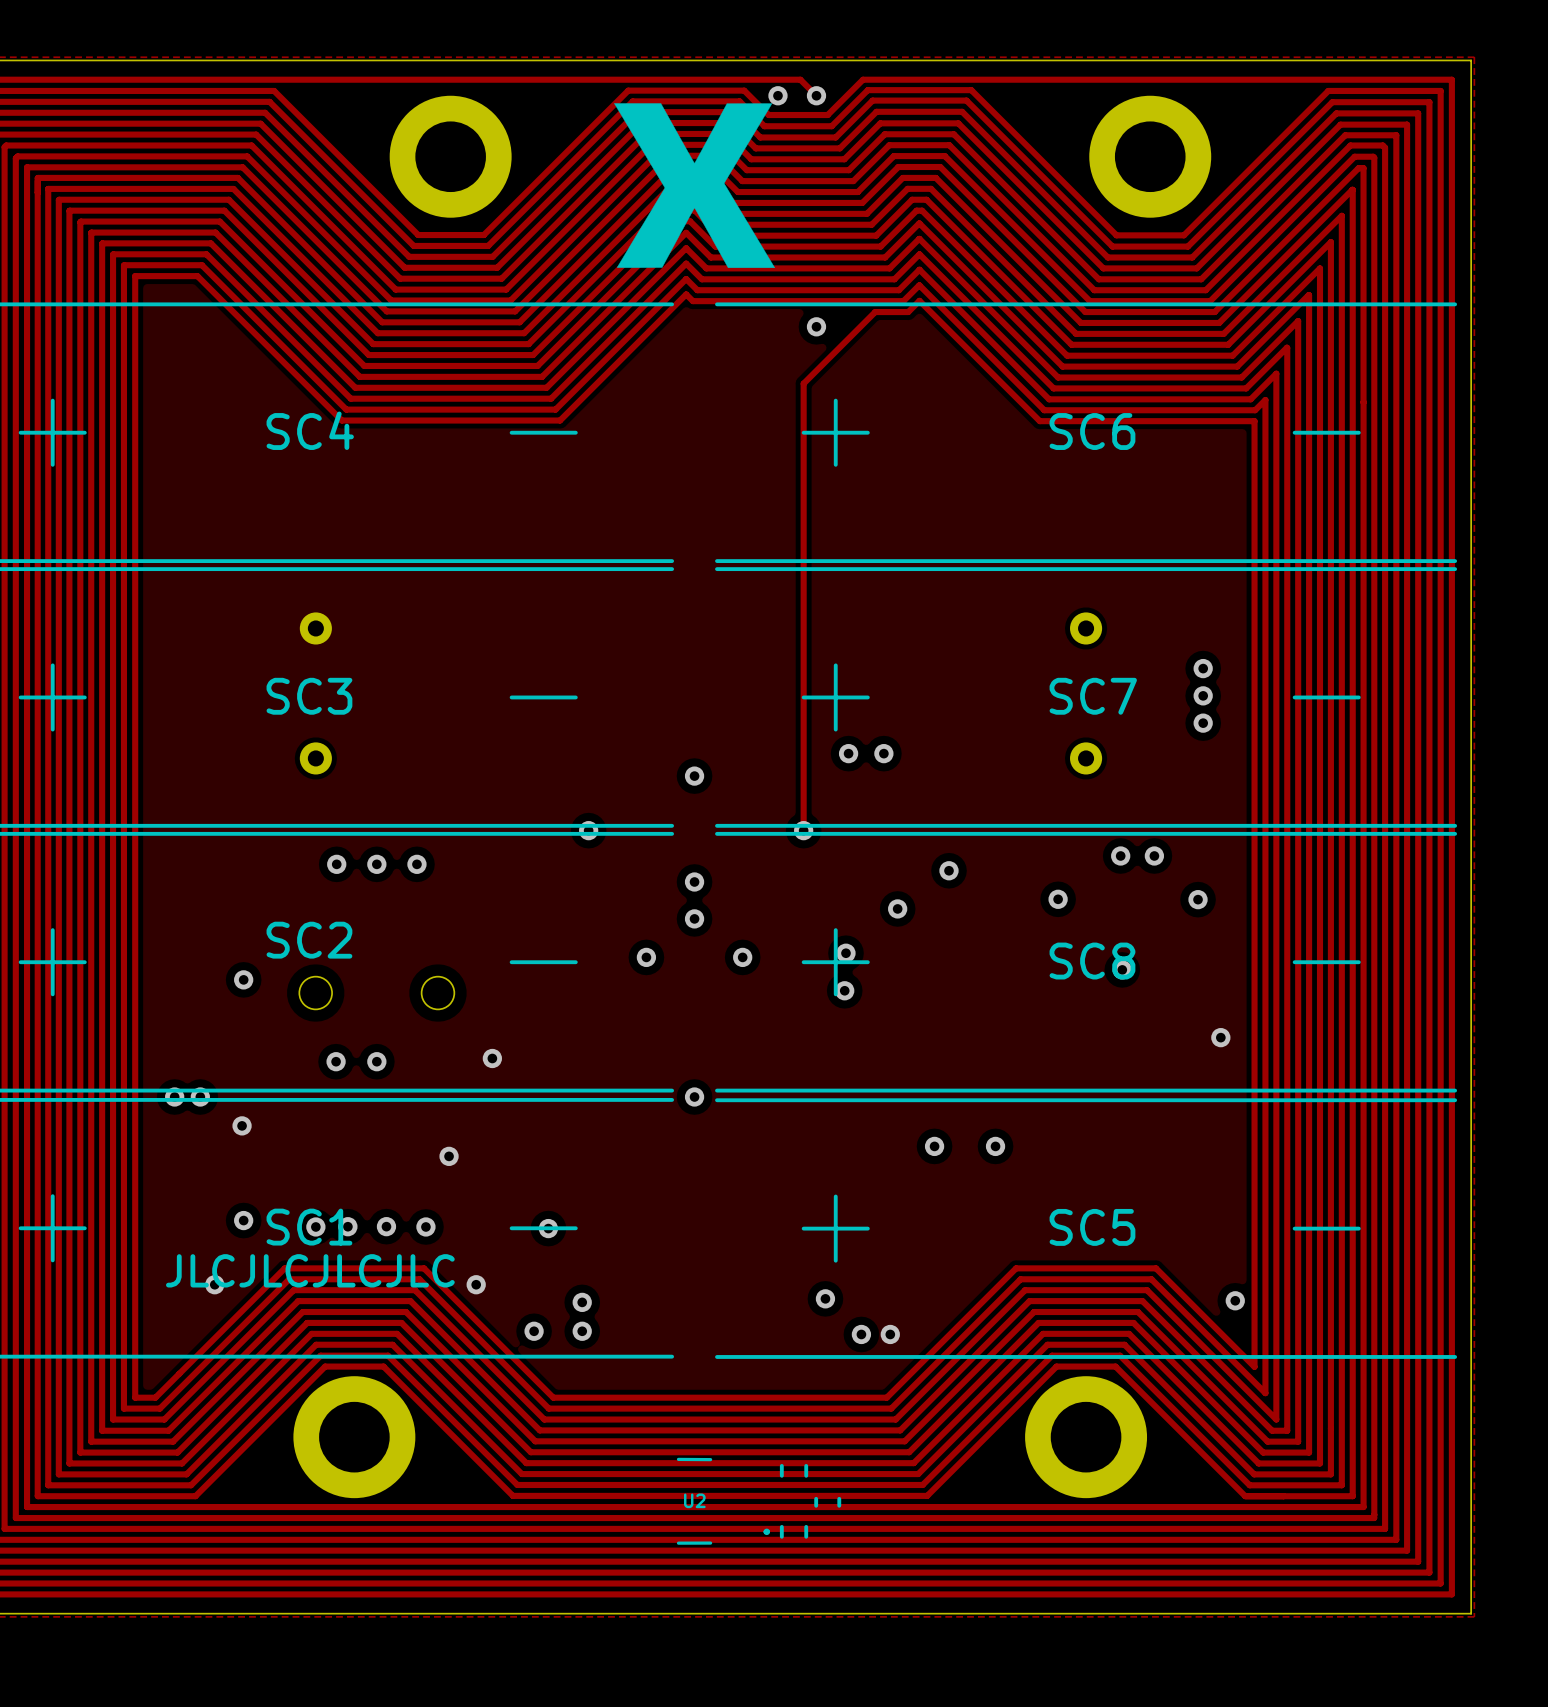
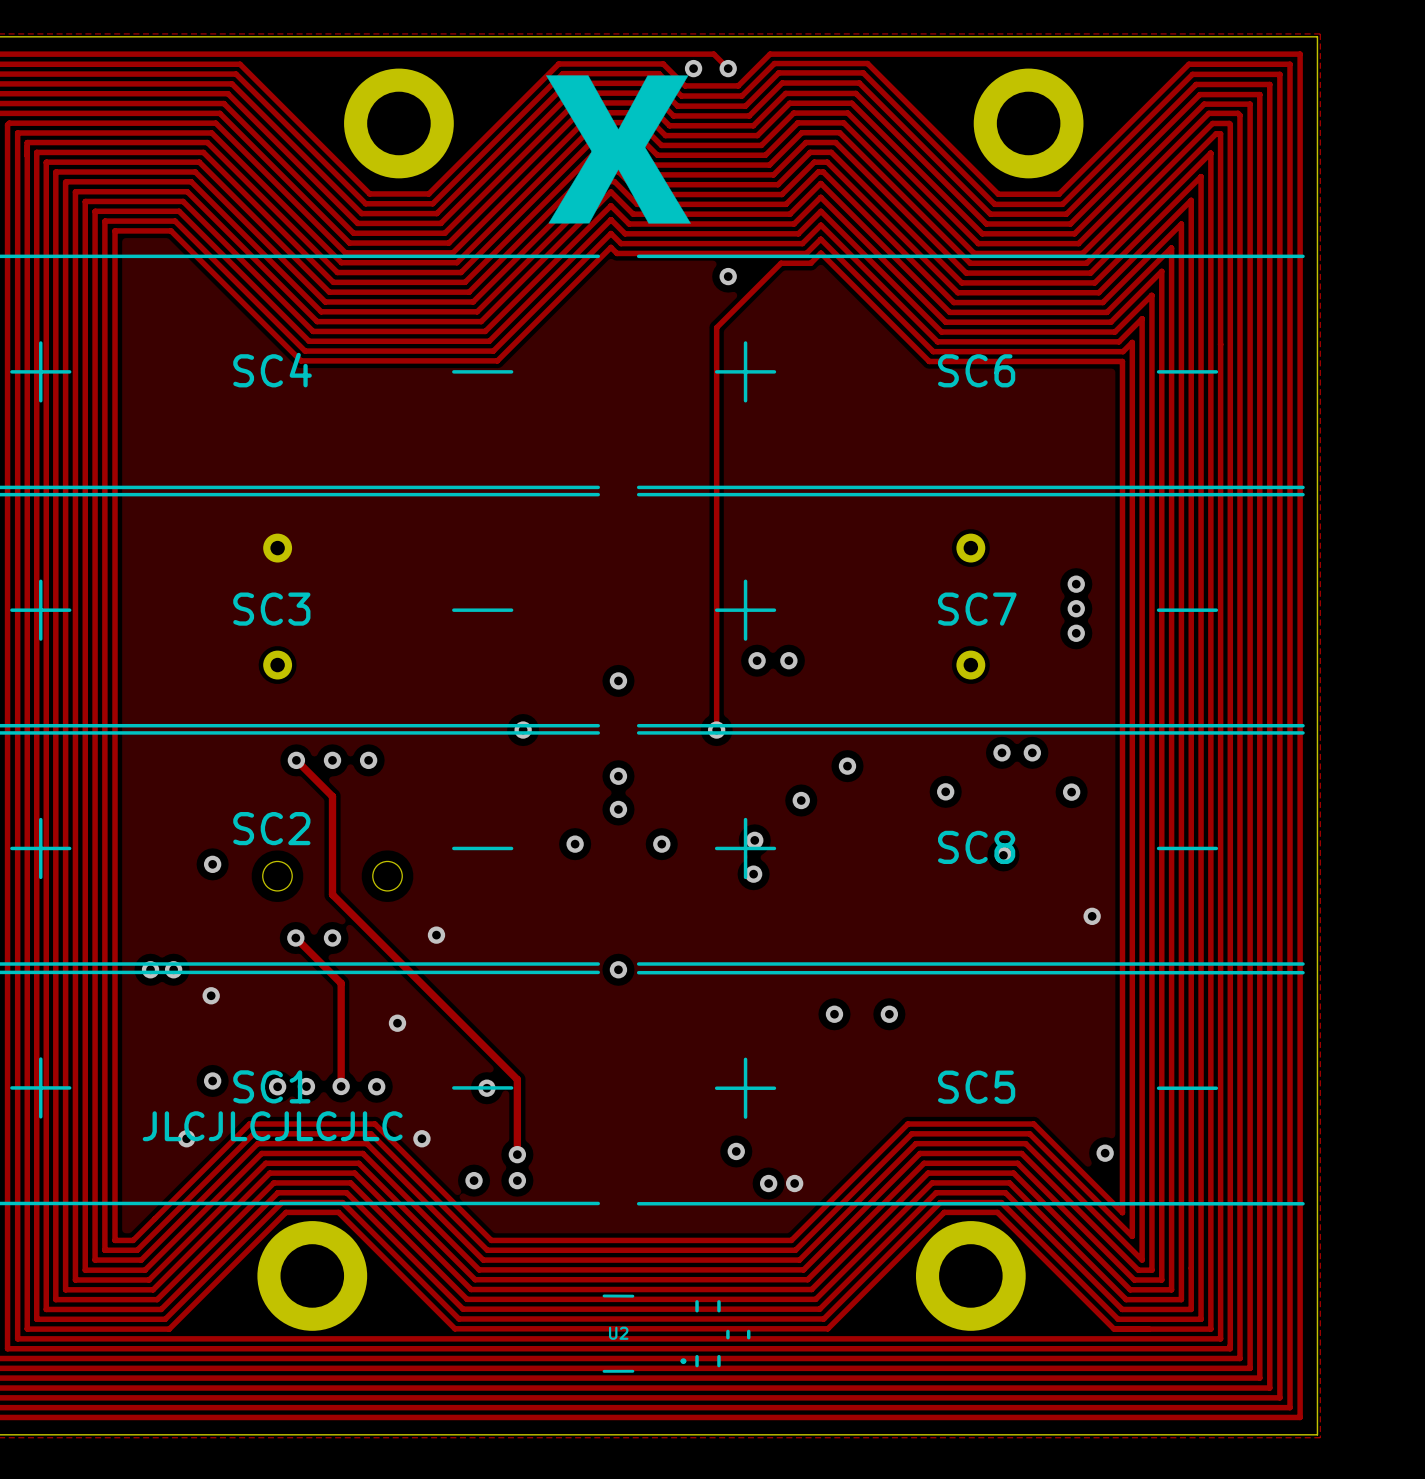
track: none -> (296, 760) (332, 796) (332, 894) (517, 1079) (517, 1154)
track: none -> (295, 938) (341, 983) (341, 1086)

